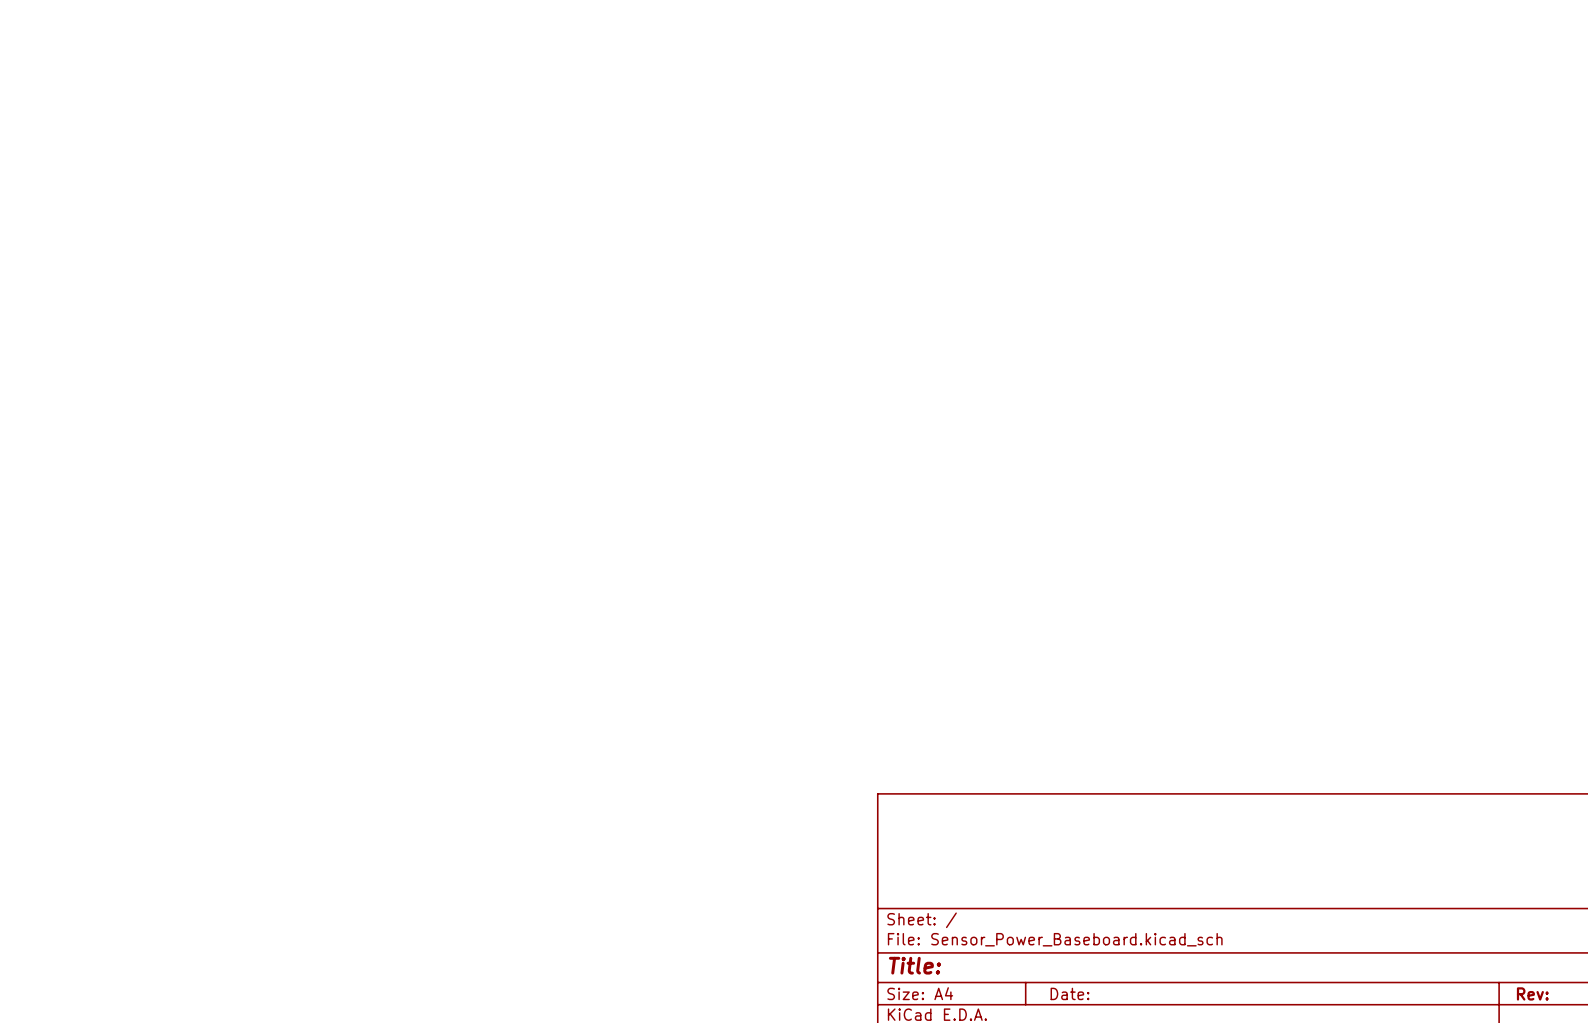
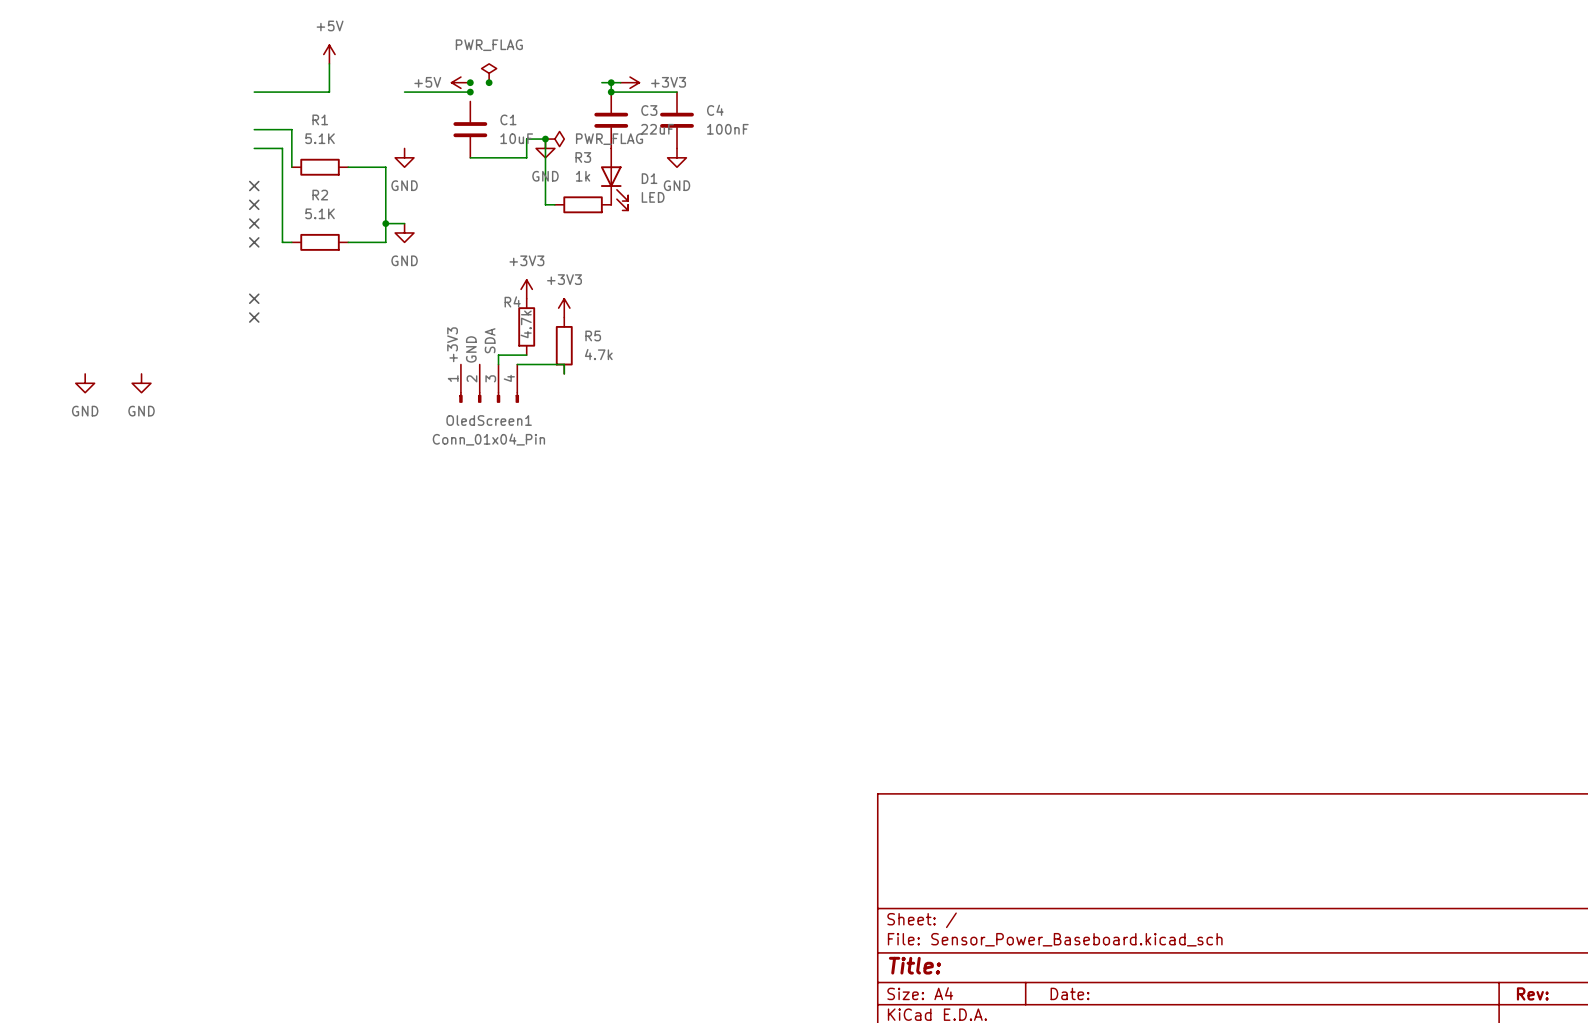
power symbol: none -> +5V (329, 54)
wire: none -> (329, 63) (329, 92) (254, 92)
power symbol: none -> PWR_FLAG (489, 73)
power symbol: none -> +5V (460, 82)
junction: none -> (470, 82)
junction: none -> (489, 82)
wire: none -> (601, 82) (620, 82)
wire: none -> (611, 82) (611, 92) (677, 92)
junction: none -> (611, 82)
power symbol: none -> +3V3 (630, 82)
wire: none -> (404, 92) (470, 92)
junction: none -> (470, 92)
junction: none -> (611, 92)
C3: none -> 22uF (611, 120)
C4: none -> 100nF (677, 120)
wire: none -> (254, 129) (291, 129) (291, 167)
C1: none -> 10uF (470, 129)
junction: none -> (545, 139)
power symbol: none -> PWR_FLAG (554, 139)
wire: none -> (254, 148) (282, 148) (282, 242) (291, 242)
power symbol: none -> GND (545, 148)
power symbol: none -> GND (404, 157)
wire: none -> (470, 157) (526, 157) (526, 139) (545, 139) (545, 204) (554, 204)
power symbol: none -> GND (677, 157)
R1: none -> 5.1K (320, 167)
wire: none -> (348, 167) (385, 167) (385, 242) (348, 242)
D1: none -> LED (614, 179)
no-connect mark: none -> (254, 186)
no-connect mark: none -> (254, 204)
R3: none -> 1k (583, 204)
no-connect mark: none -> (254, 223)
wire: none -> (385, 223) (404, 223)
junction: none -> (385, 223)
power symbol: none -> GND (404, 232)
no-connect mark: none -> (254, 242)
R2: none -> 5.1K (320, 242)
power symbol: none -> +3V3 (526, 289)
no-connect mark: none -> (254, 298)
power symbol: none -> +3V3 (564, 308)
no-connect mark: none -> (254, 317)
R4: none -> 4.7k (526, 326)
label: none -> SDA (490, 340)
label: none -> +3V3 (452, 344)
R5: none -> 4.7k (564, 345)
label: none -> GND (471, 349)
wire: none -> (526, 355) (498, 355) (498, 364)
wire: none -> (517, 364) (564, 364) (564, 373)
power symbol: none -> GND (85, 383)
power symbol: none -> GND (141, 383)
OledScreen1: none -> Conn_01x04_Pin (489, 383)

